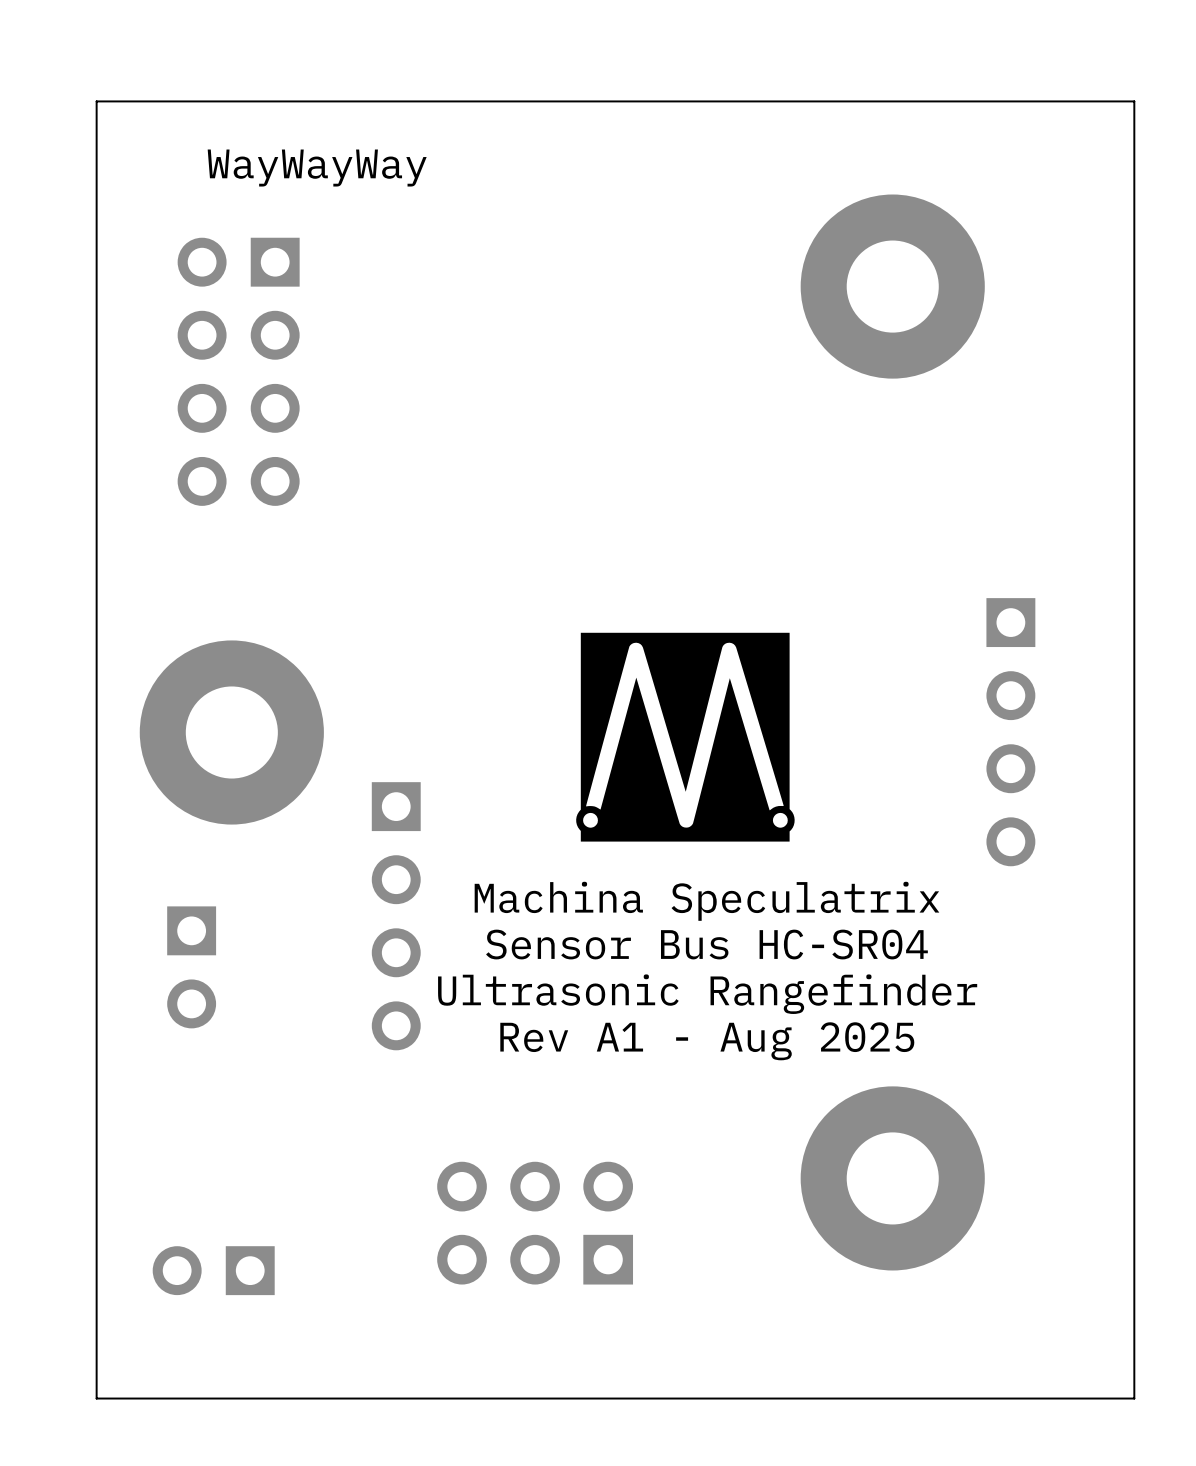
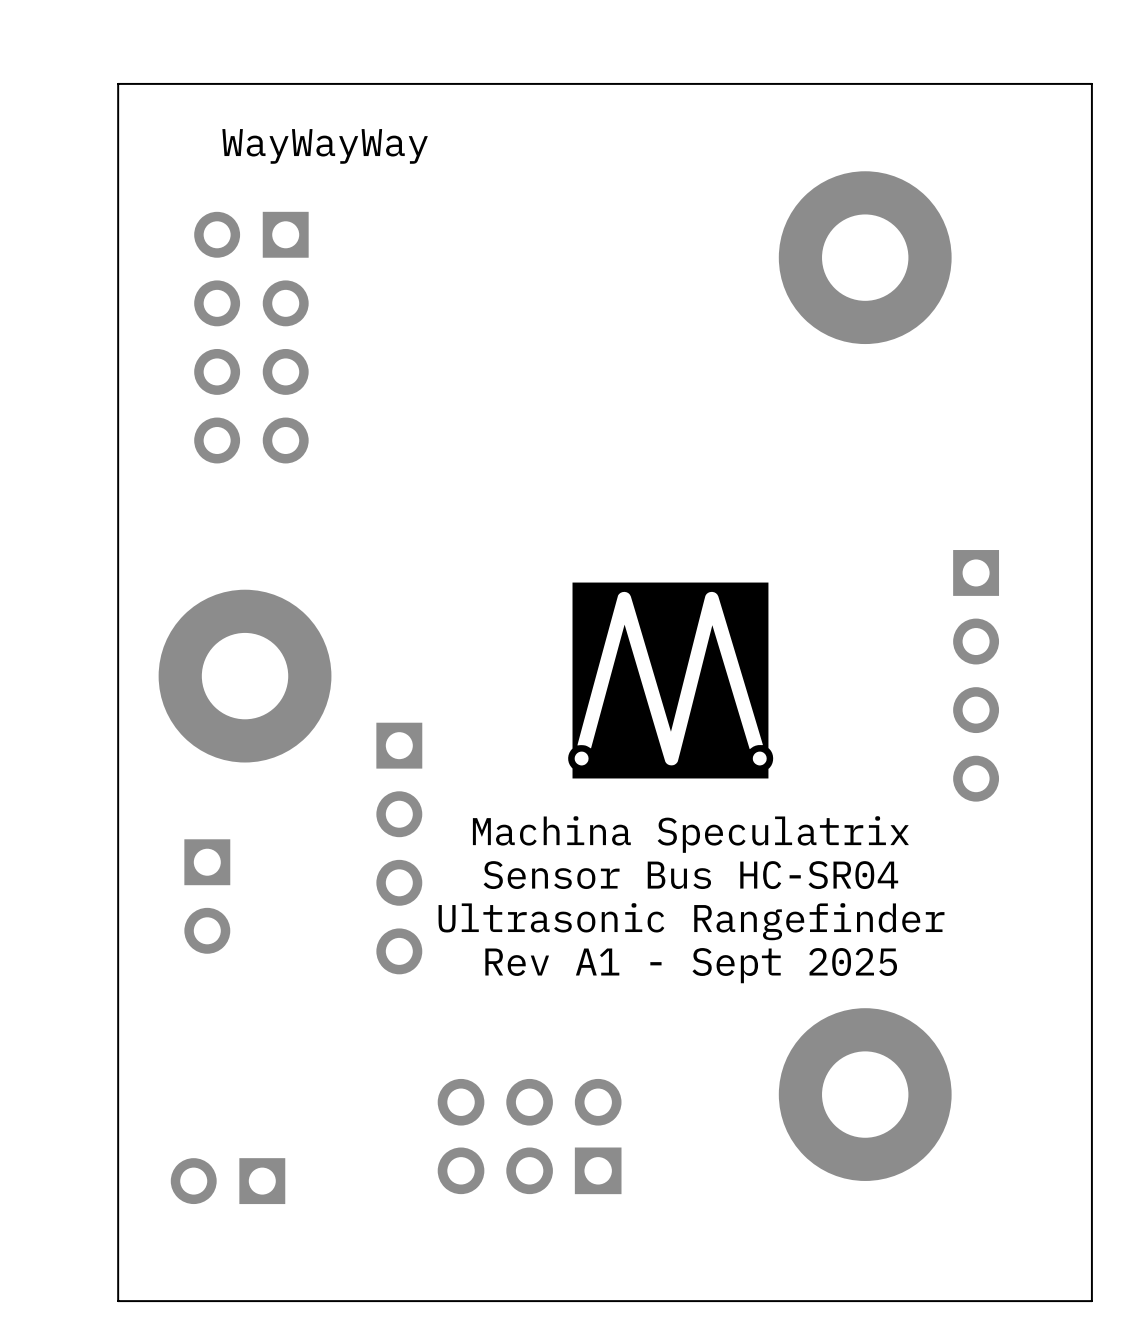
text: Rev A1 - Aug 2025 (707, 1041) -> Rev A1 - Sept 2025 (691, 965)

